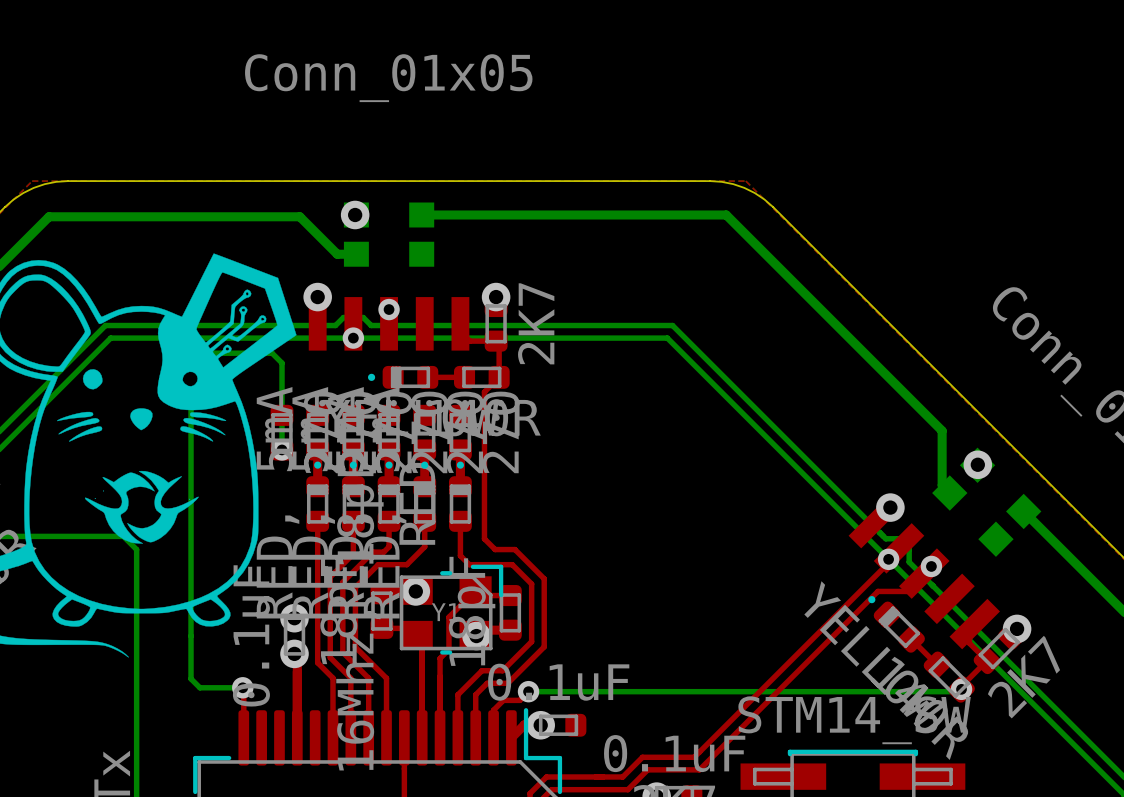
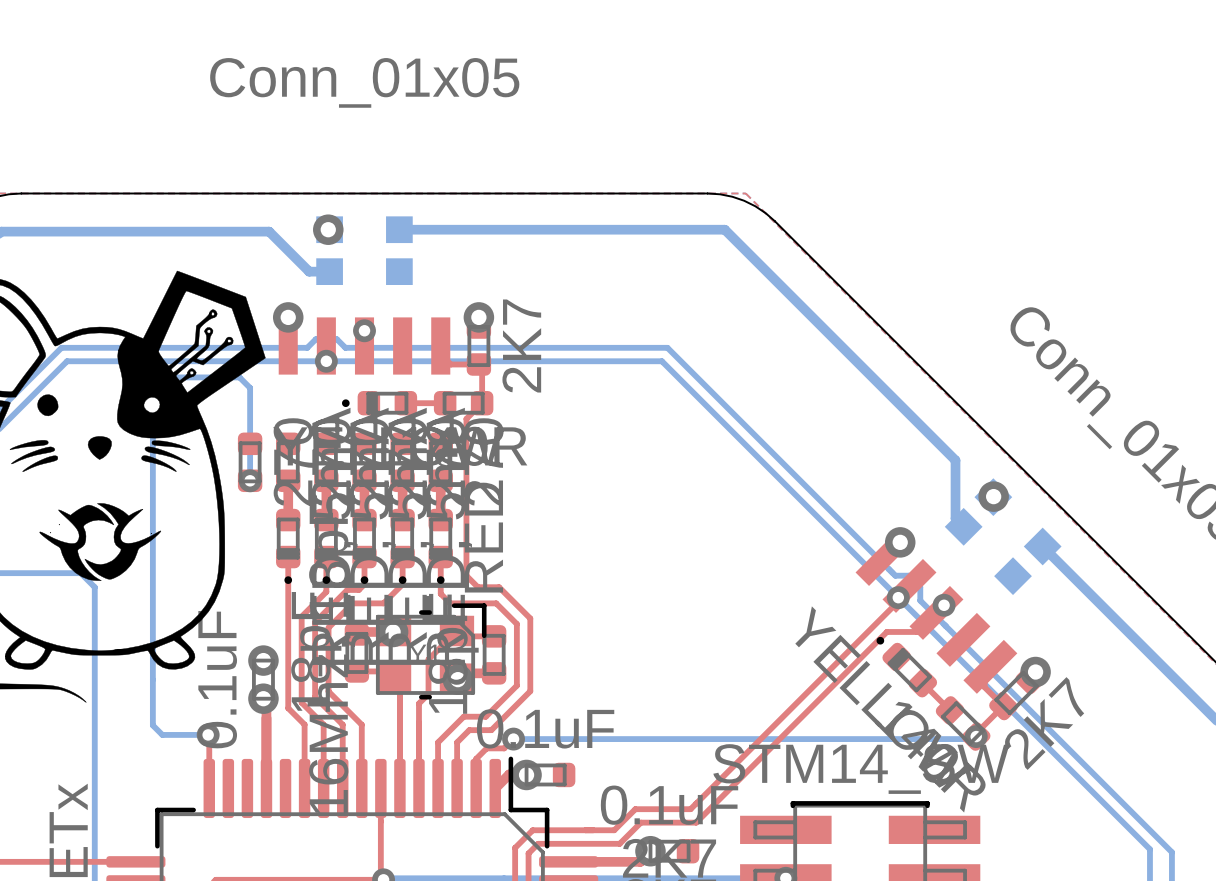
part rotation: 0° (317, 496) -> 180° (288, 546)
part rotation: 0° (353, 496) -> 180° (326, 546)
part rotation: 0° (389, 496) -> 180° (364, 546)
part rotation: 0° (424, 496) -> 180° (402, 546)
part rotation: 0° (460, 496) -> 180° (440, 546)

